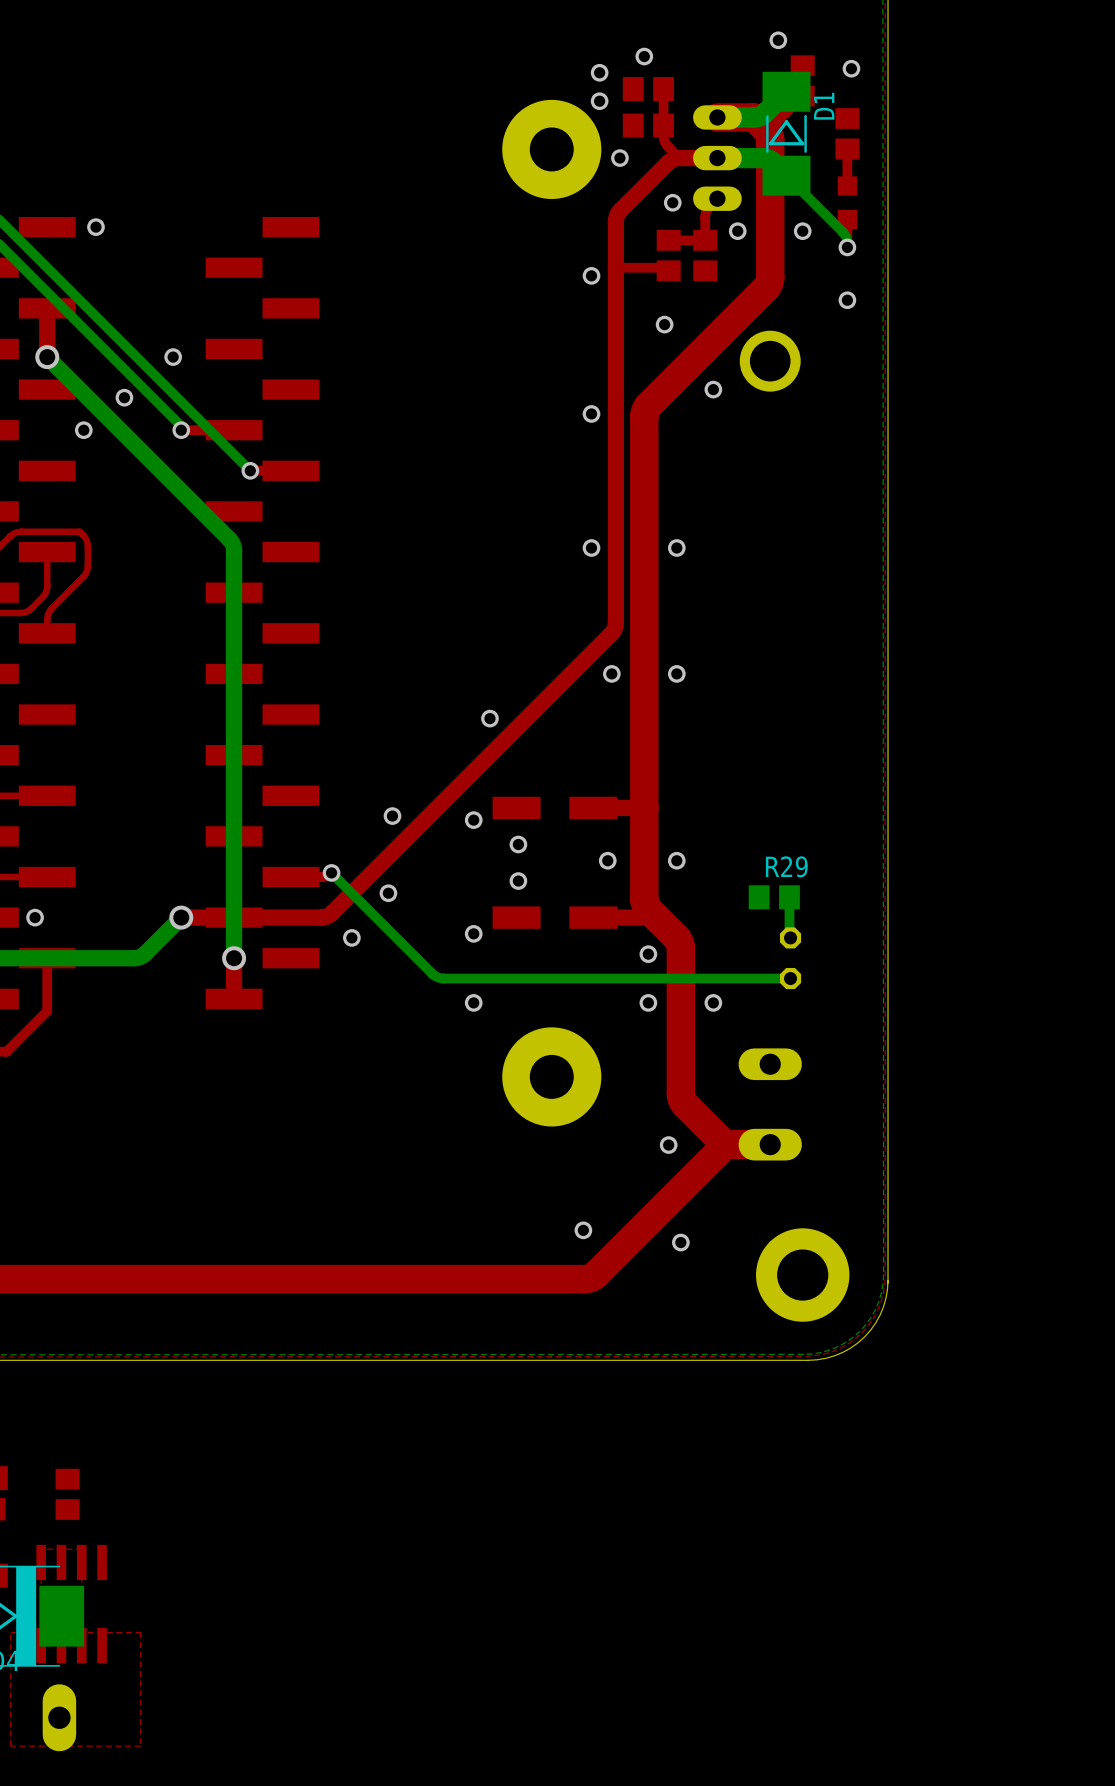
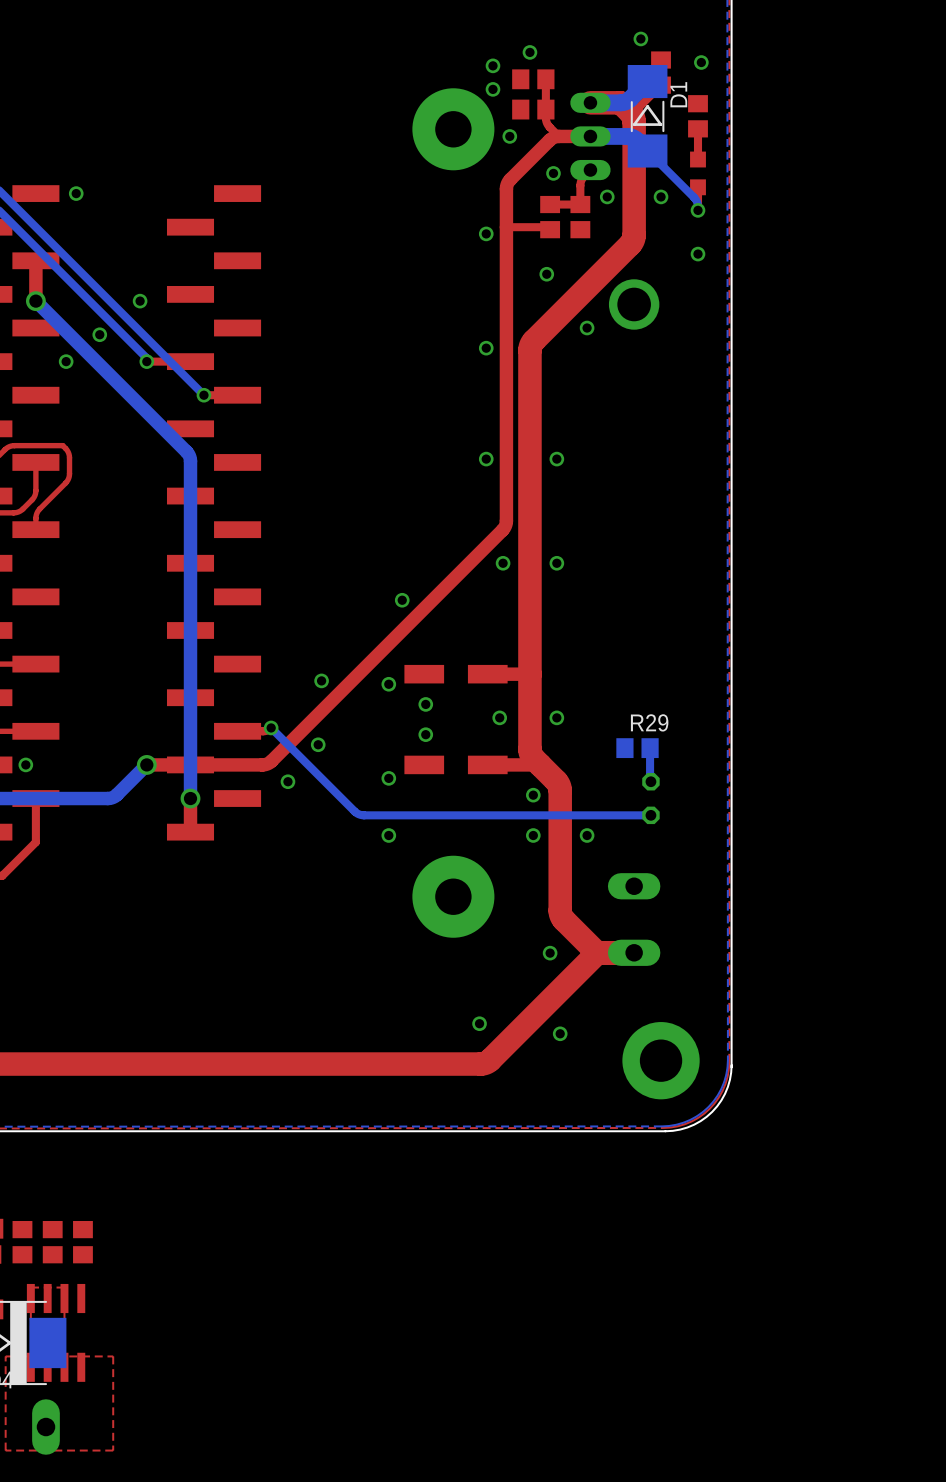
part: none -> (22, 1242)
part: none -> (82, 1242)

